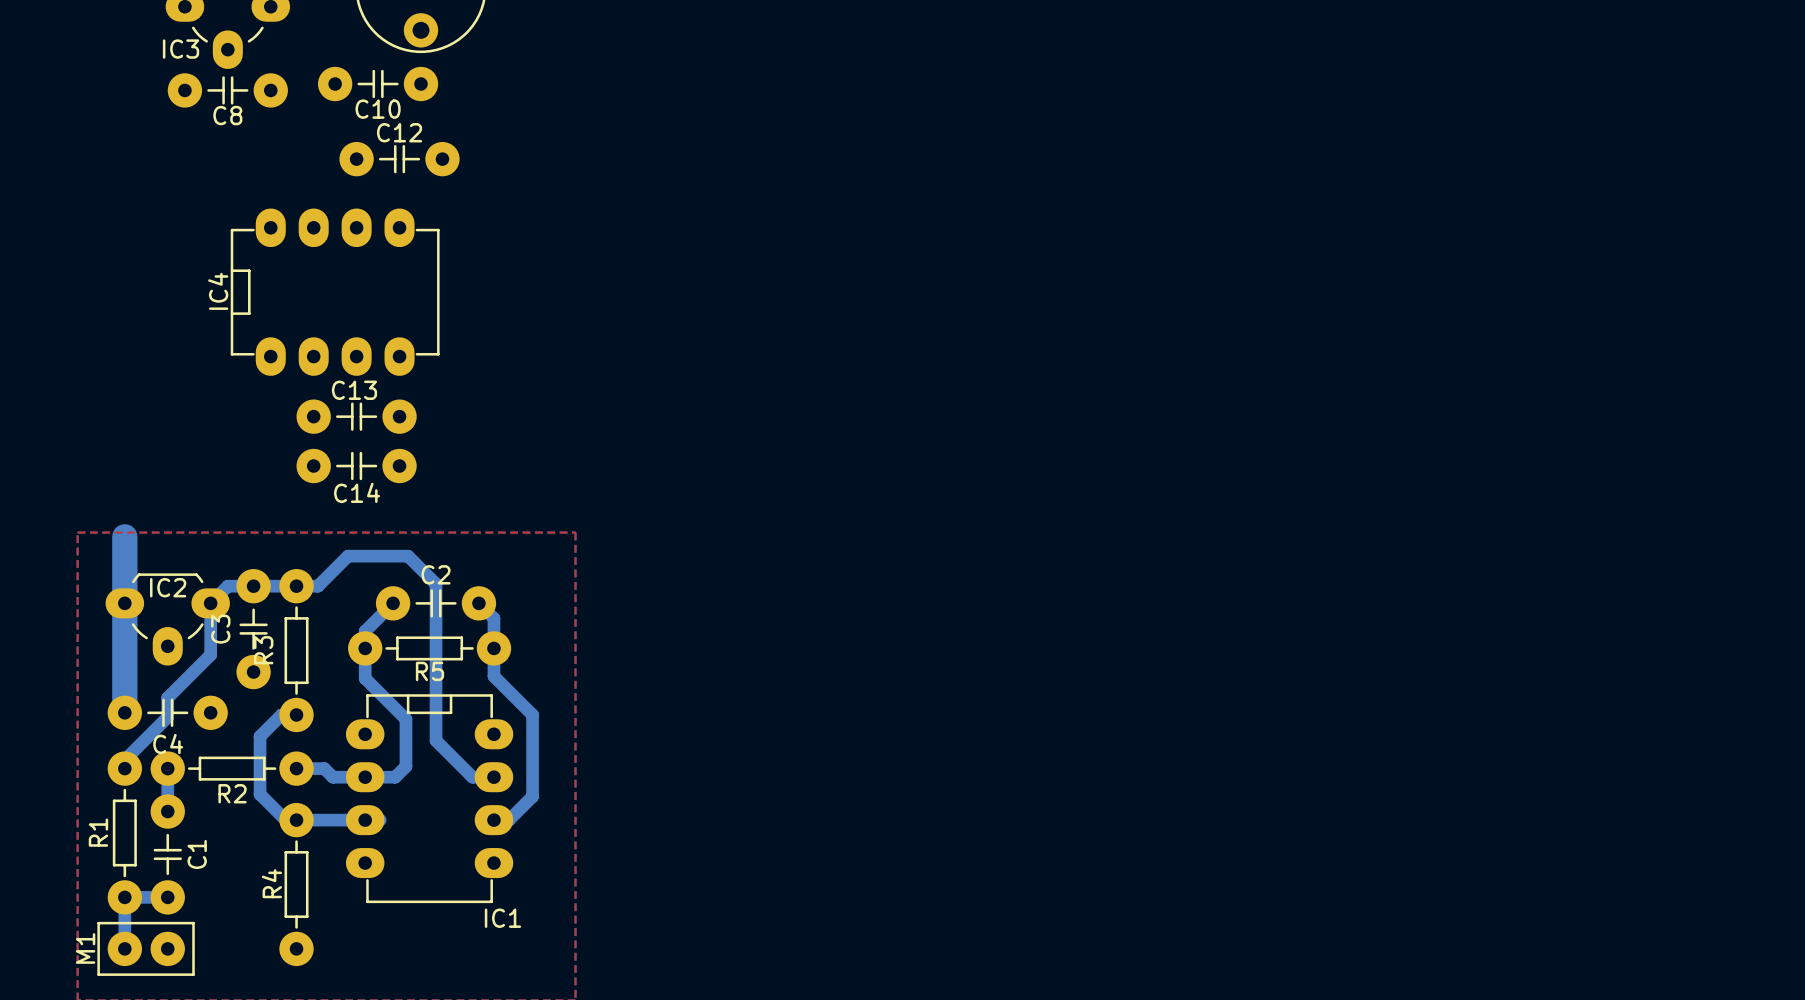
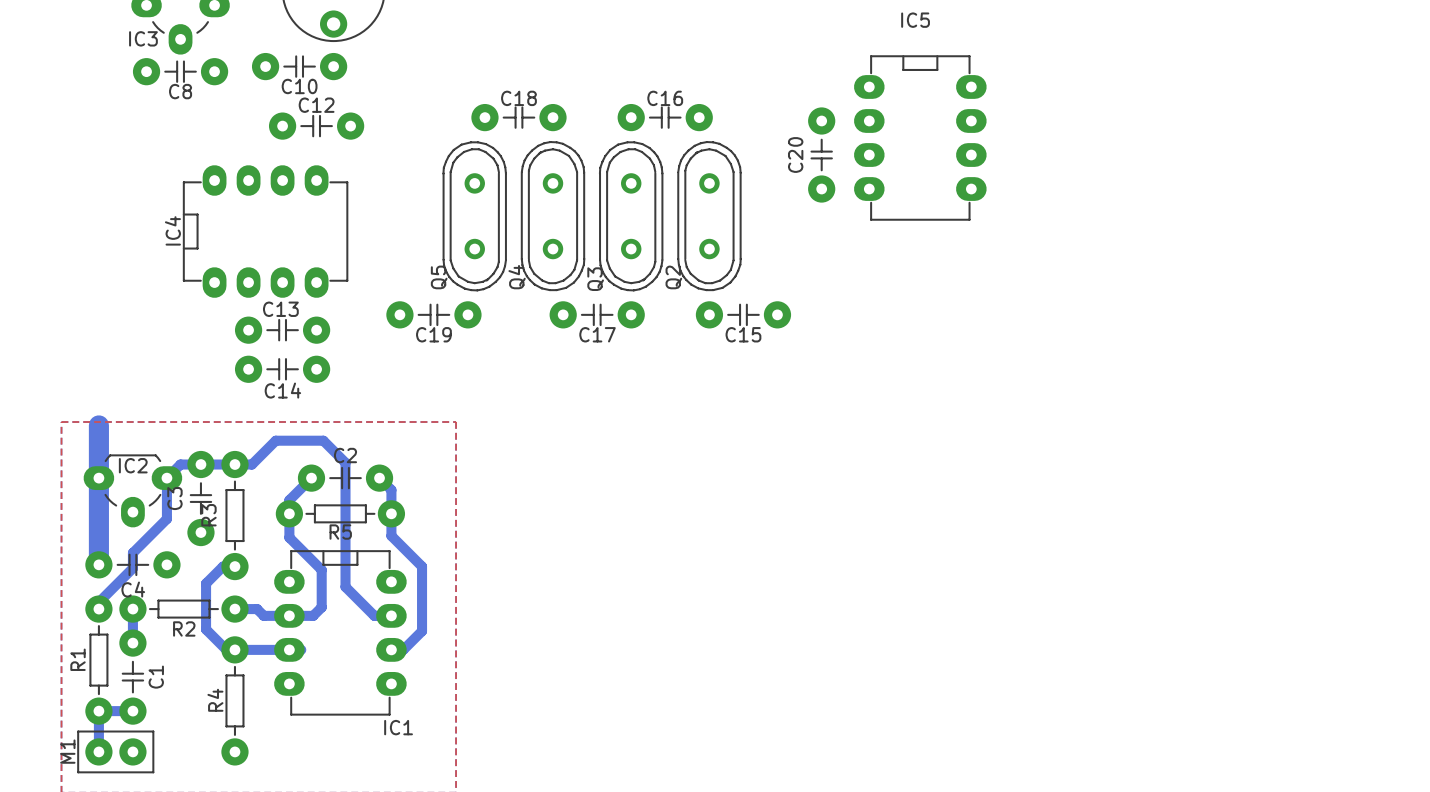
C18: none -> (518, 117)
C16: none -> (665, 117)
IC5: none -> (920, 137)
C20: none -> (821, 155)
Q4: none -> (553, 216)
Q2: none -> (709, 216)
Q5: none -> (474, 216)
Q3: none -> (631, 216)
C19: none -> (433, 314)
C17: none -> (597, 314)
C15: none -> (743, 314)

